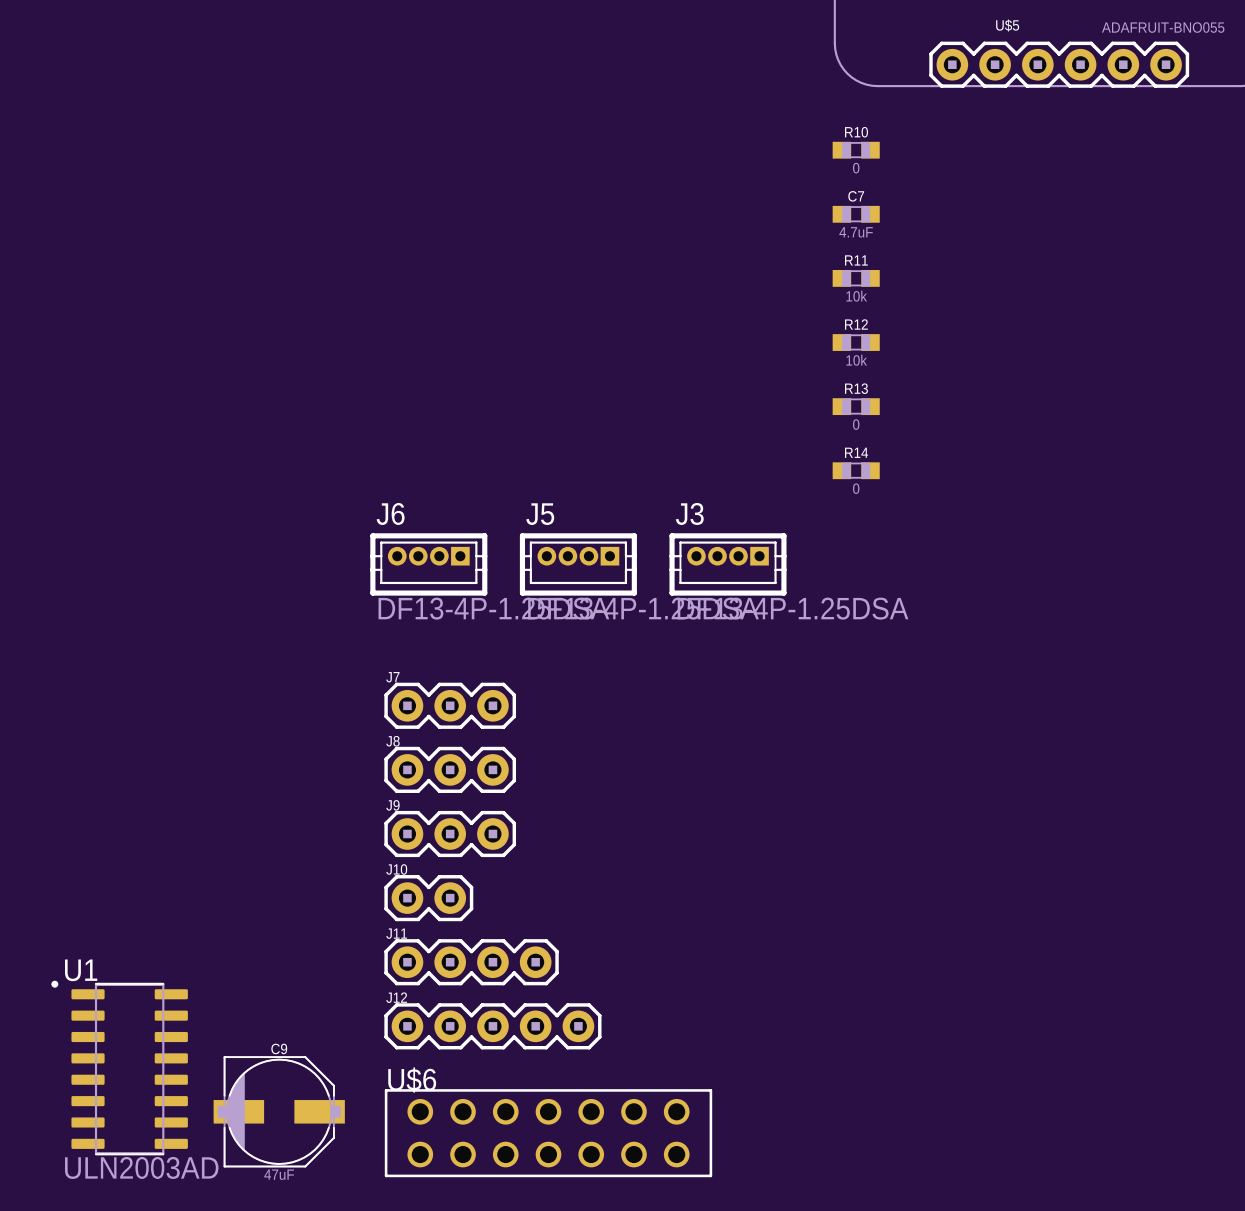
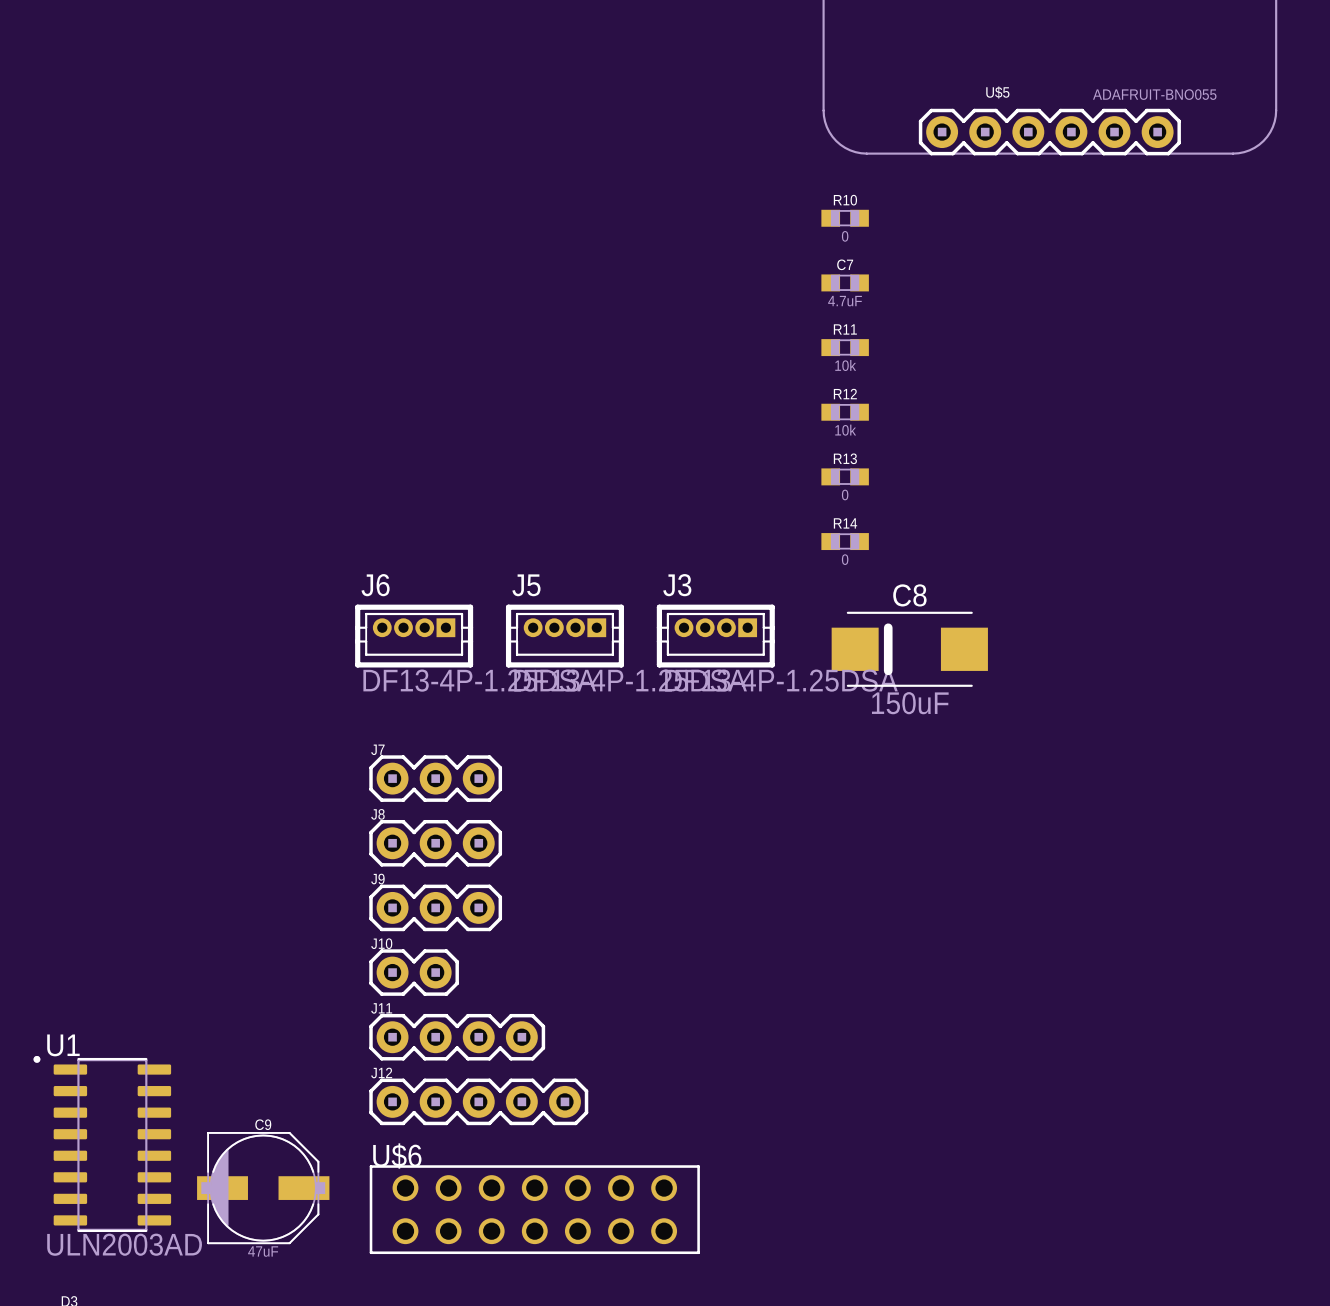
C8: none -> 150uF (909, 649)

